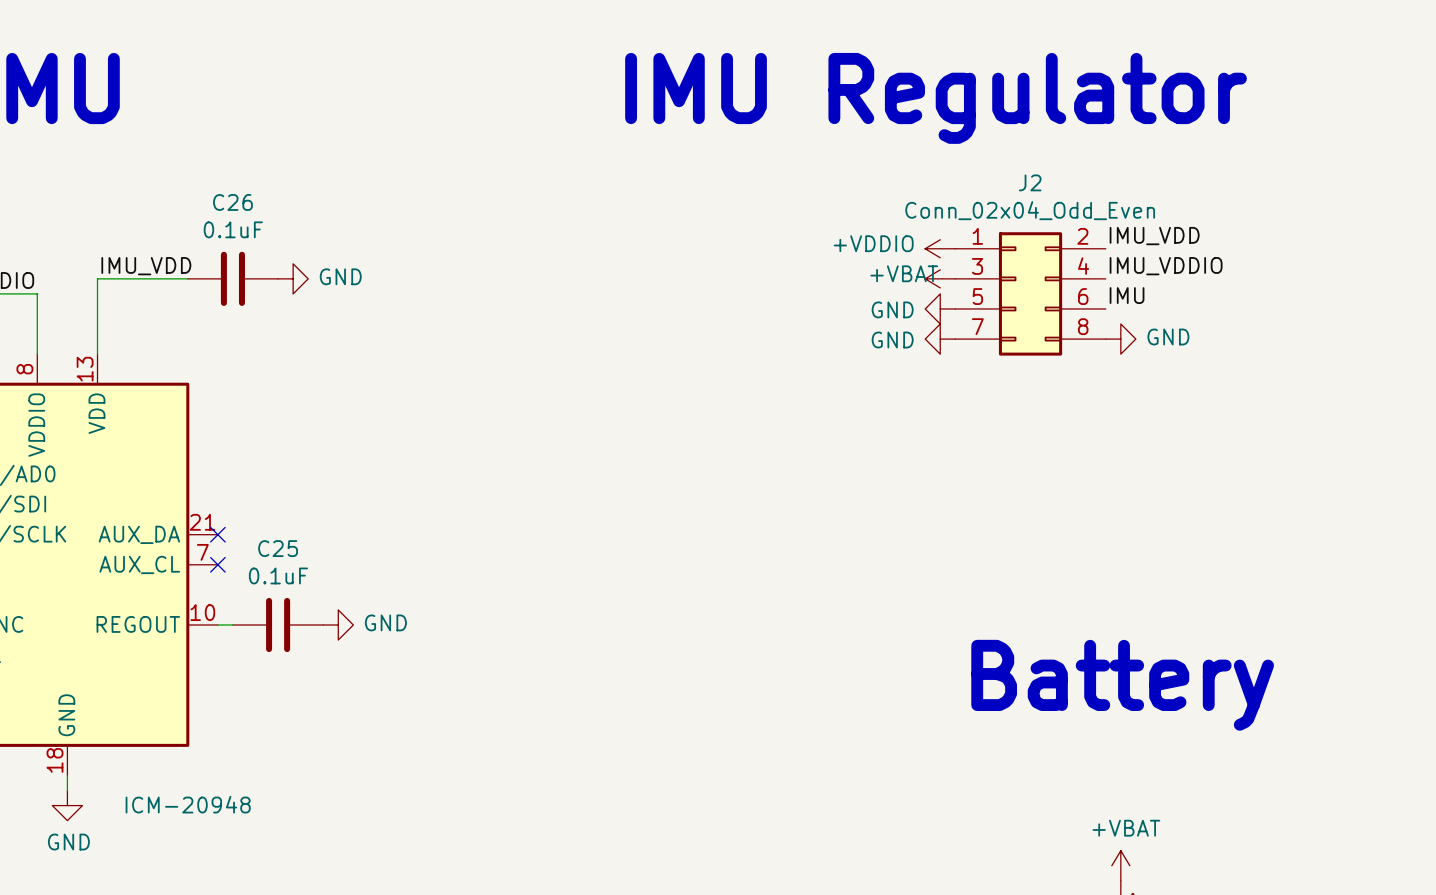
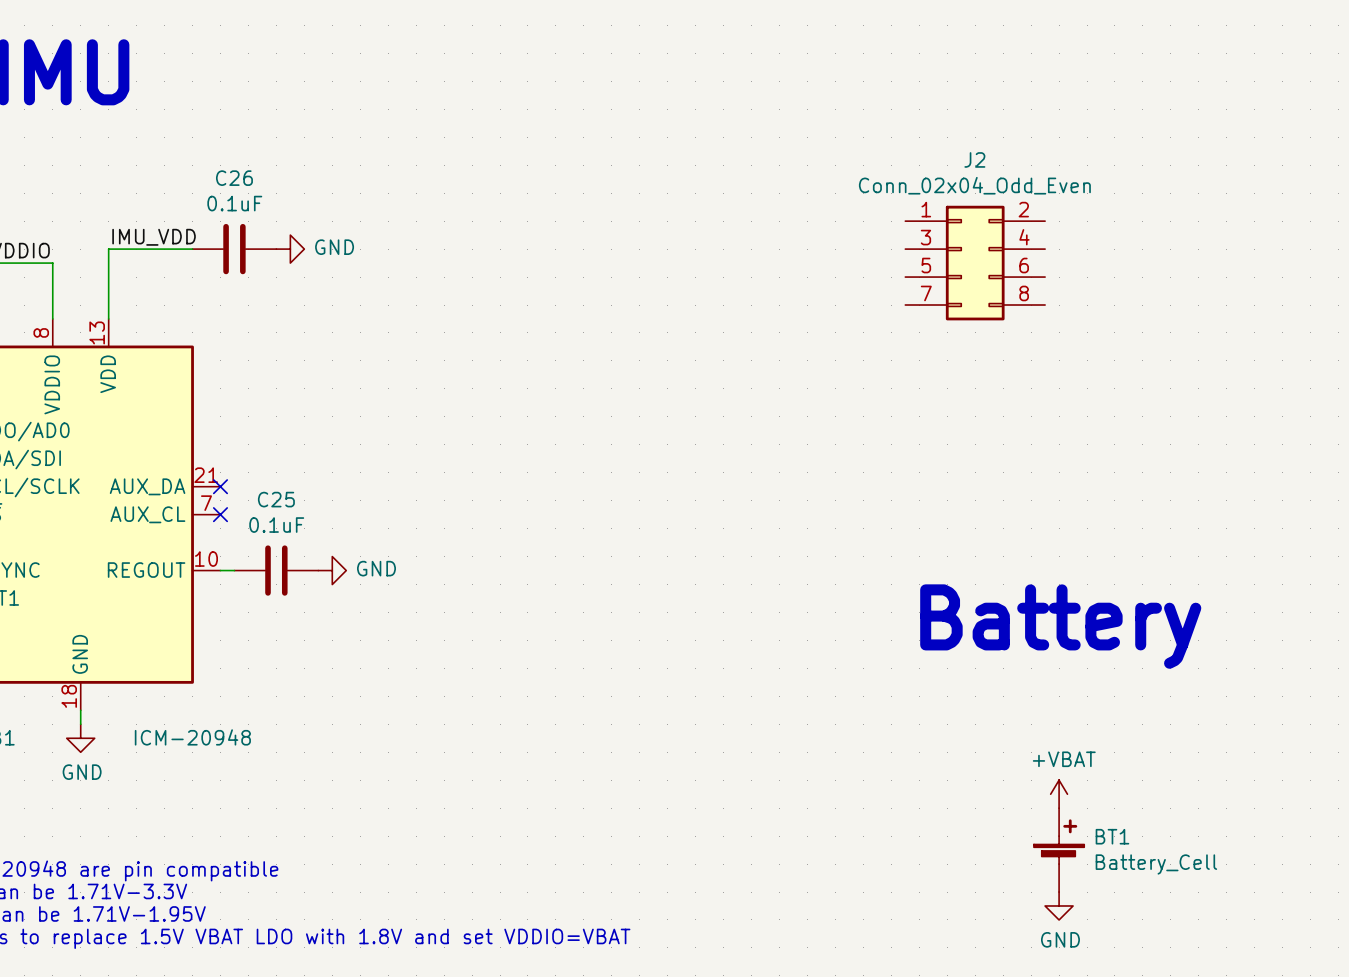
text: IMU Regulator (936, 98) -> none
label: IMU_VDD (1154, 236) -> none
power symbol: +VDDIO (940, 248) -> none
label: IMU_VDDIO (1166, 266) -> none
power symbol: +VBAT (940, 278) -> none
label: IMU (1127, 295) -> none
power symbol: GND (940, 308) -> none
power symbol: GND (940, 339) -> none
power symbol: GND (1120, 339) -> none

